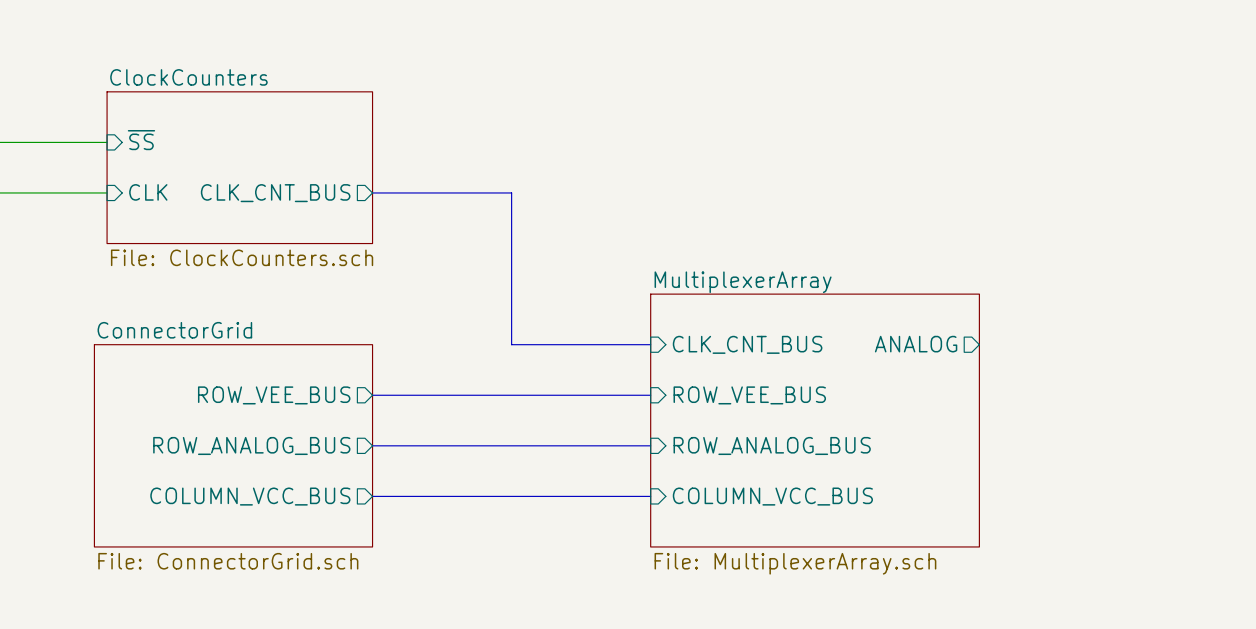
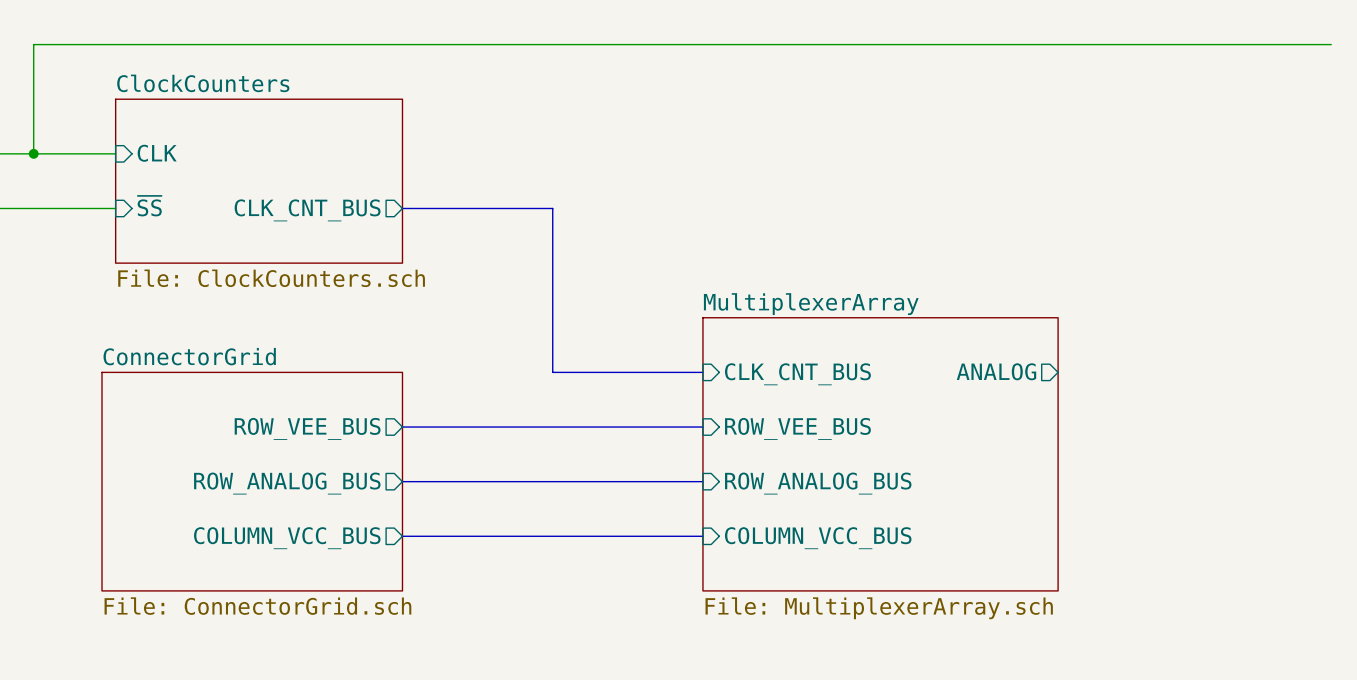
wire: none -> (1331, 44) (33, 44) (33, 153)
sheet pin: ~{SS} (141, 140) -> CLK (157, 153)
junction: none -> (33, 153)
sheet pin: CLK (148, 192) -> ~{SS} (149, 206)

